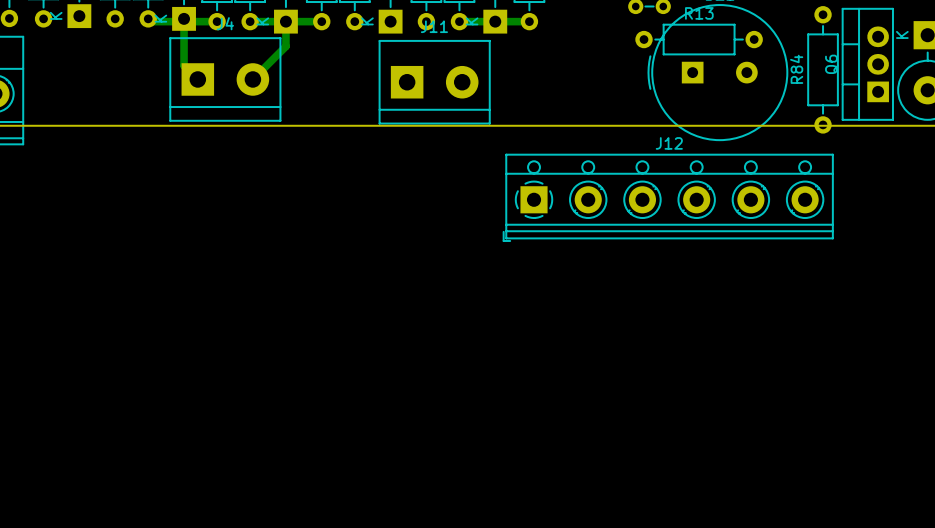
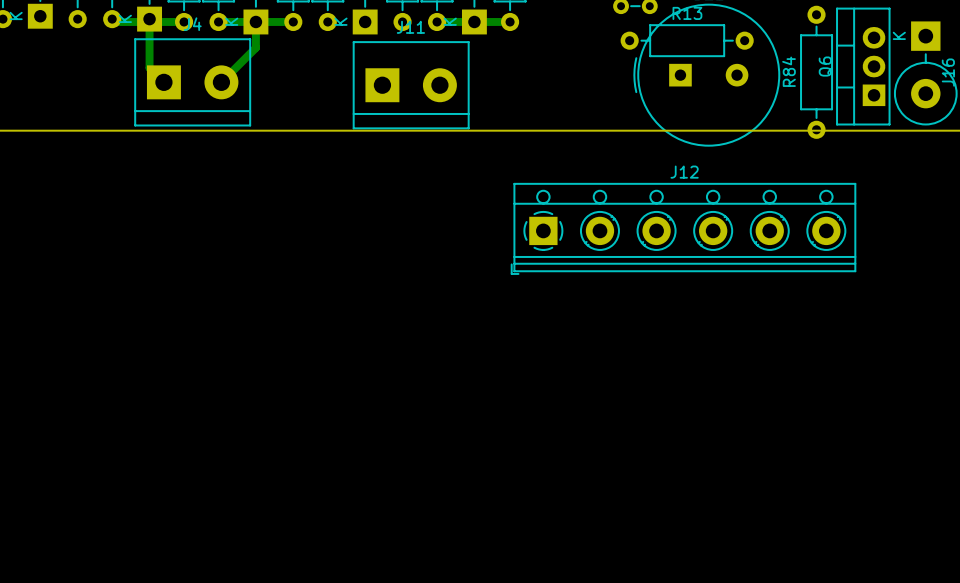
J12 position: (668, 197) -> (683, 228)

